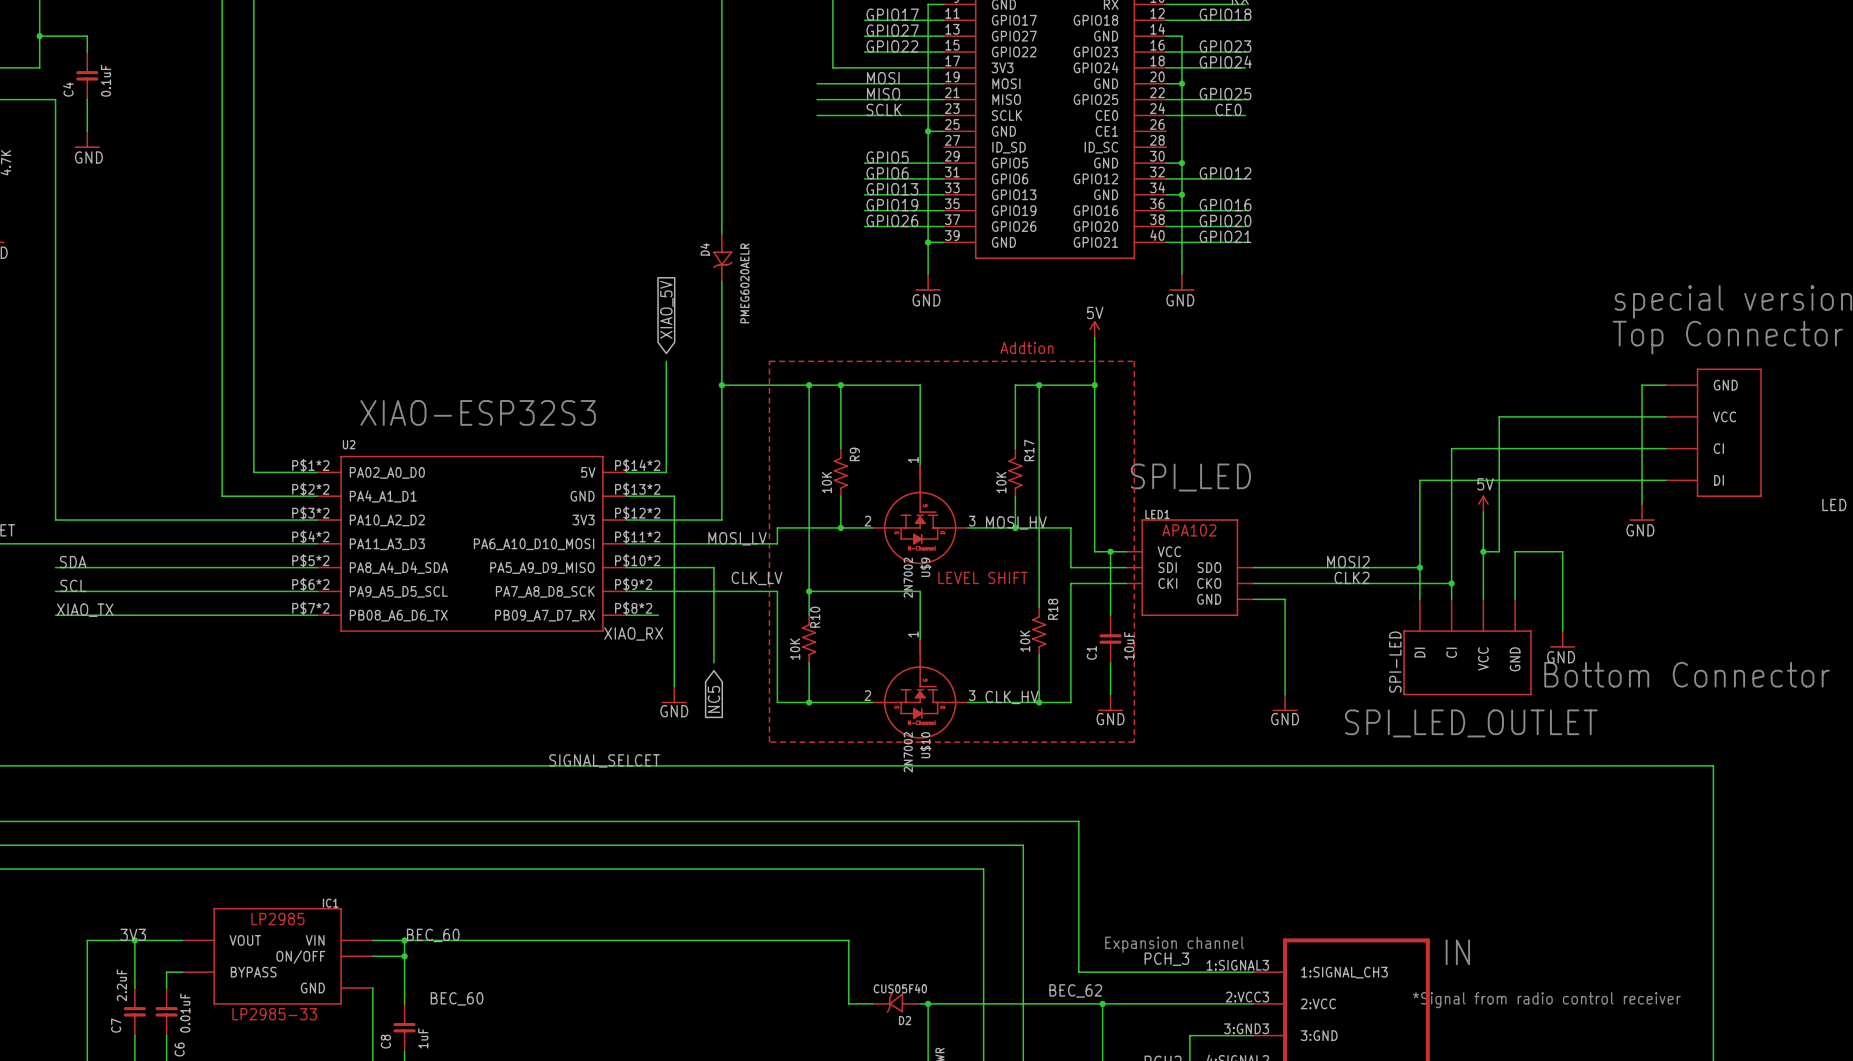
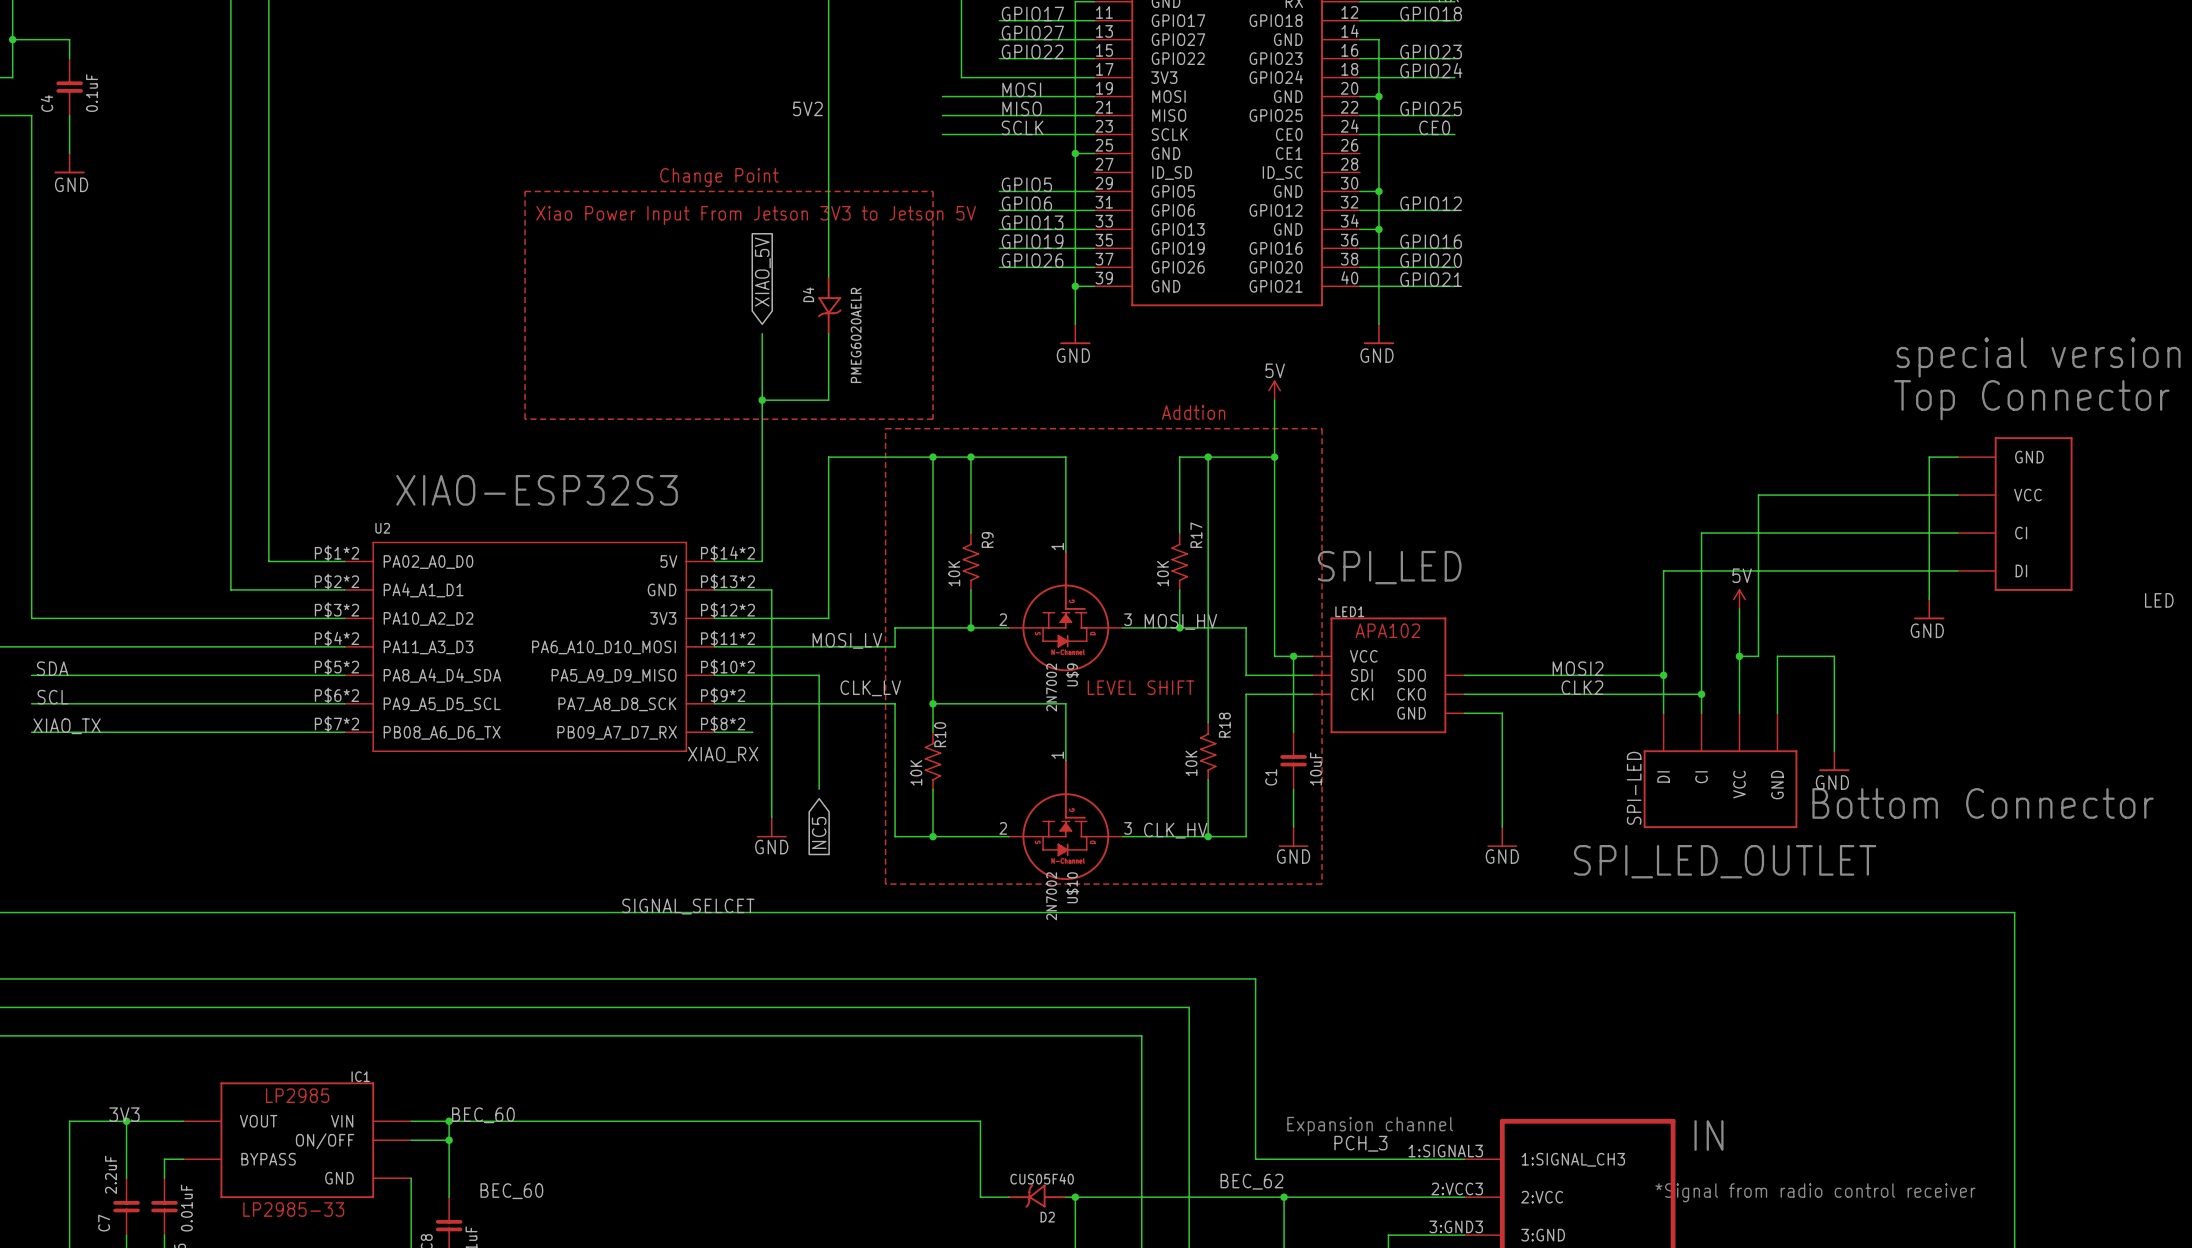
label: none -> 5V2 (807, 108)
text: none -> Change Point (719, 177)
line: none -> (525, 191) (933, 191) (933, 419) (525, 419) (525, 191)
text: none -> Xiao Power Input From Jetson 3V3 to Jetson 5V (756, 215)
wire: none -> (762, 333) (762, 428)
global label position: XIAO_5V (666, 309) -> XIAO_5V (762, 272)
junction: none -> (762, 400)
wire: (721, 337) (721, 385) -> (828, 400) (762, 400)
junction: (721, 385) -> none

